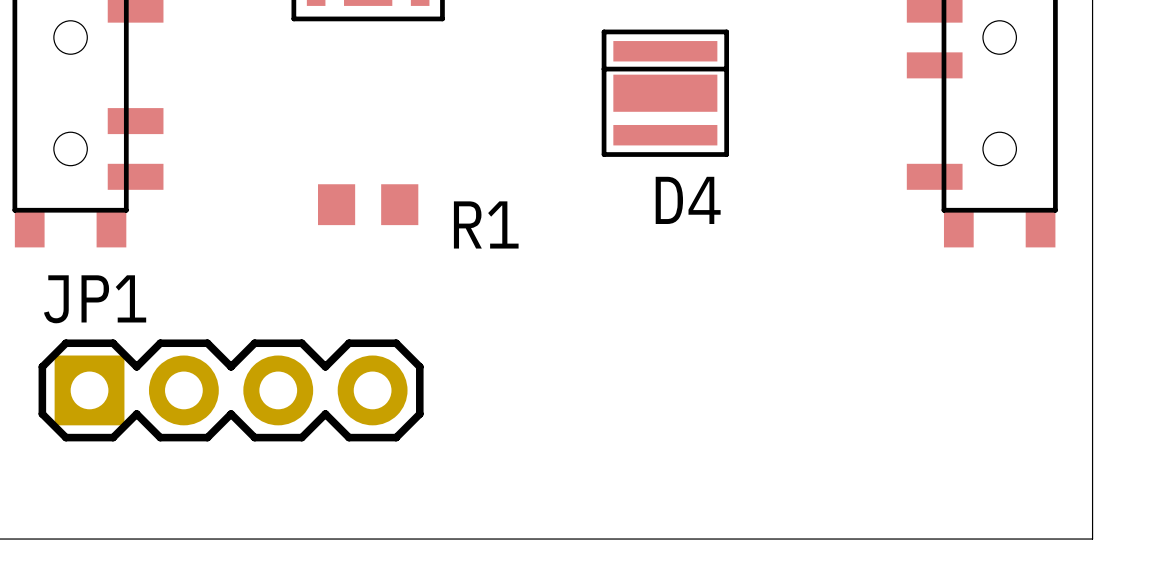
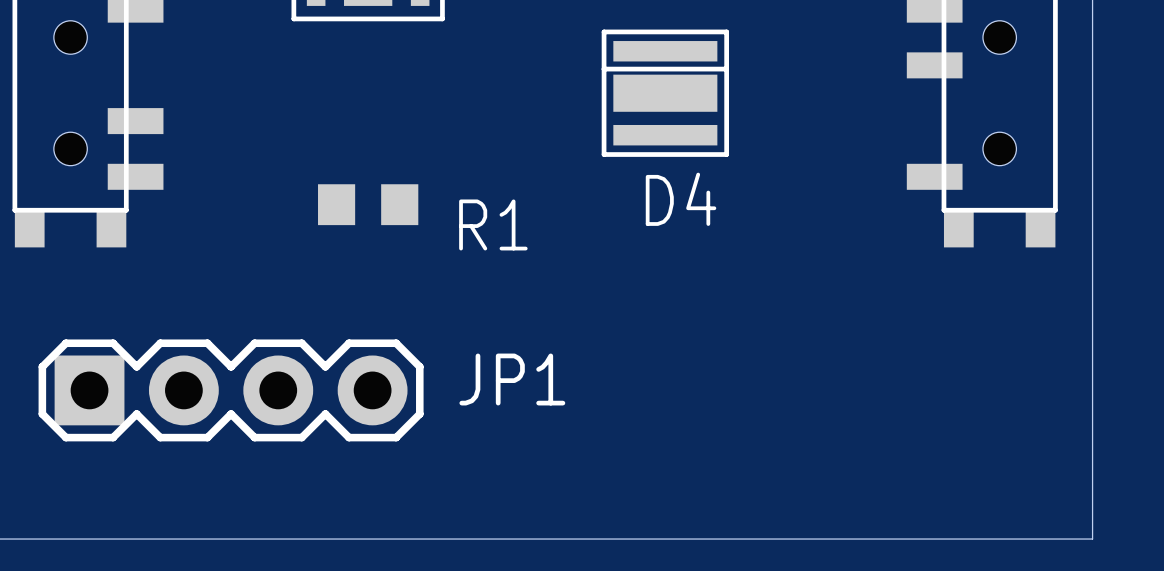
JP1 name position: JP1 (95, 299) -> JP1 (512, 379)

